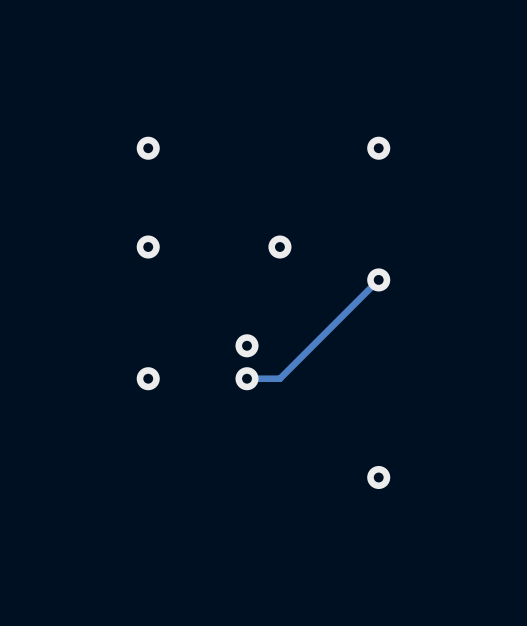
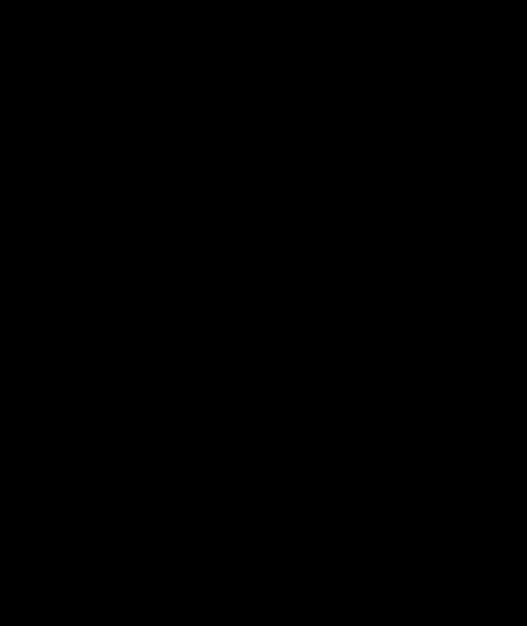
via: (148, 148) -> none
via: (378, 148) -> none
via: (148, 247) -> none
via: (279, 247) -> none
track: (378, 279) (279, 378) (247, 378) -> none
via: (378, 279) -> none
via: (247, 345) -> none
via: (148, 378) -> none
via: (247, 378) -> none
via: (378, 477) -> none

